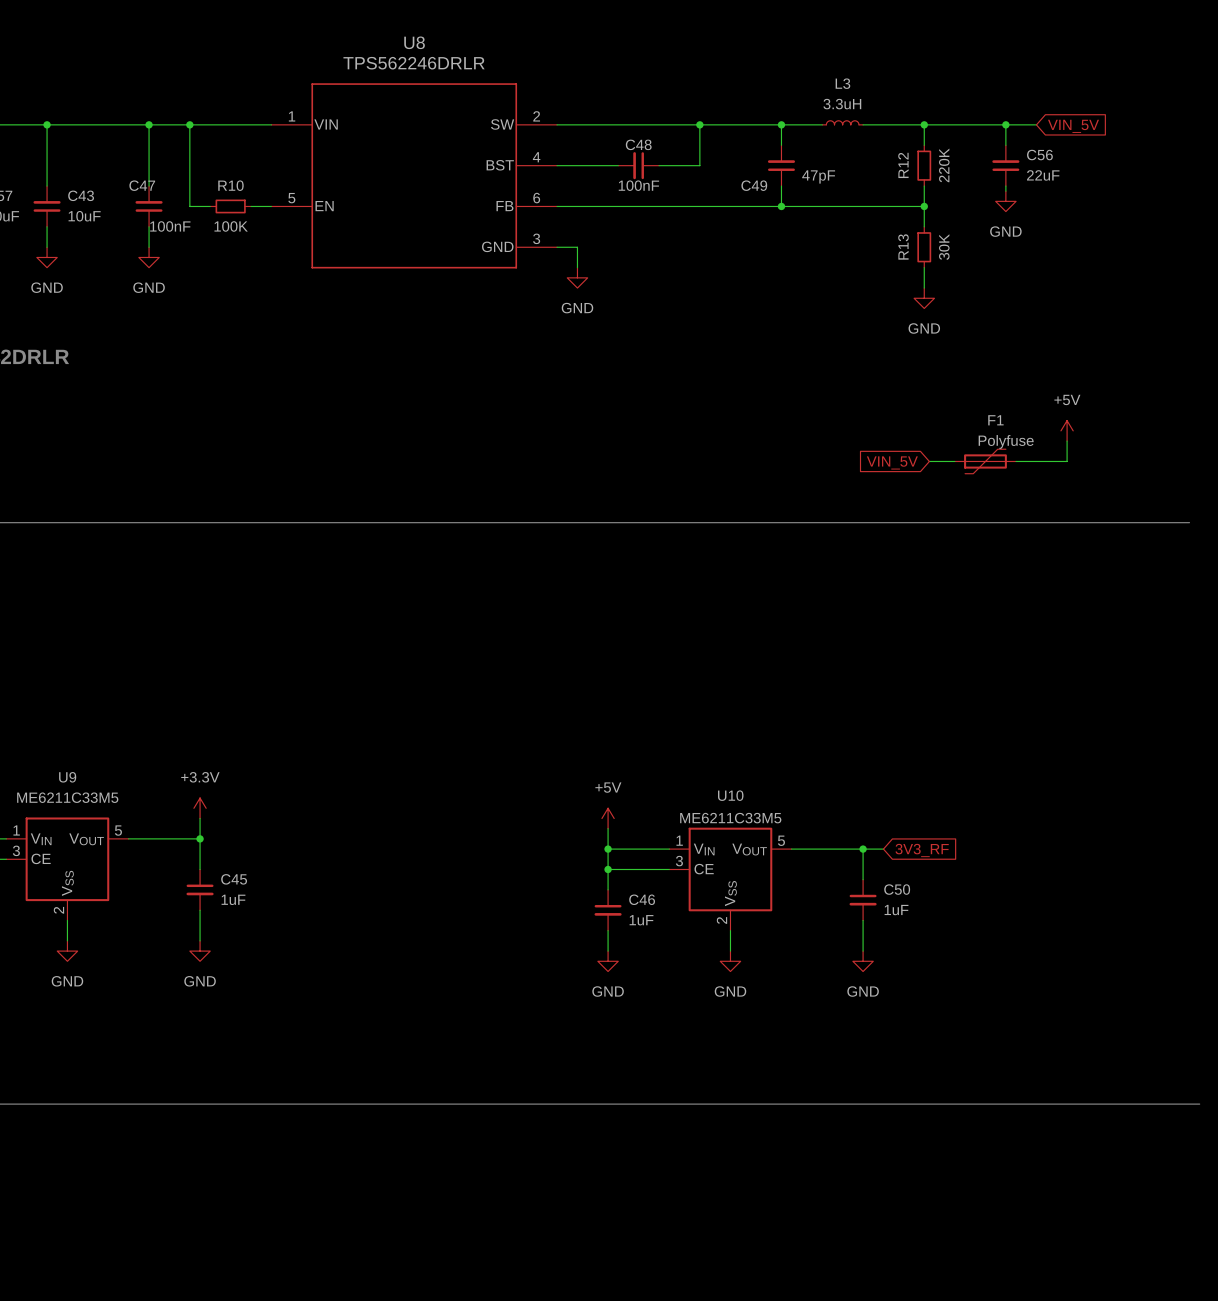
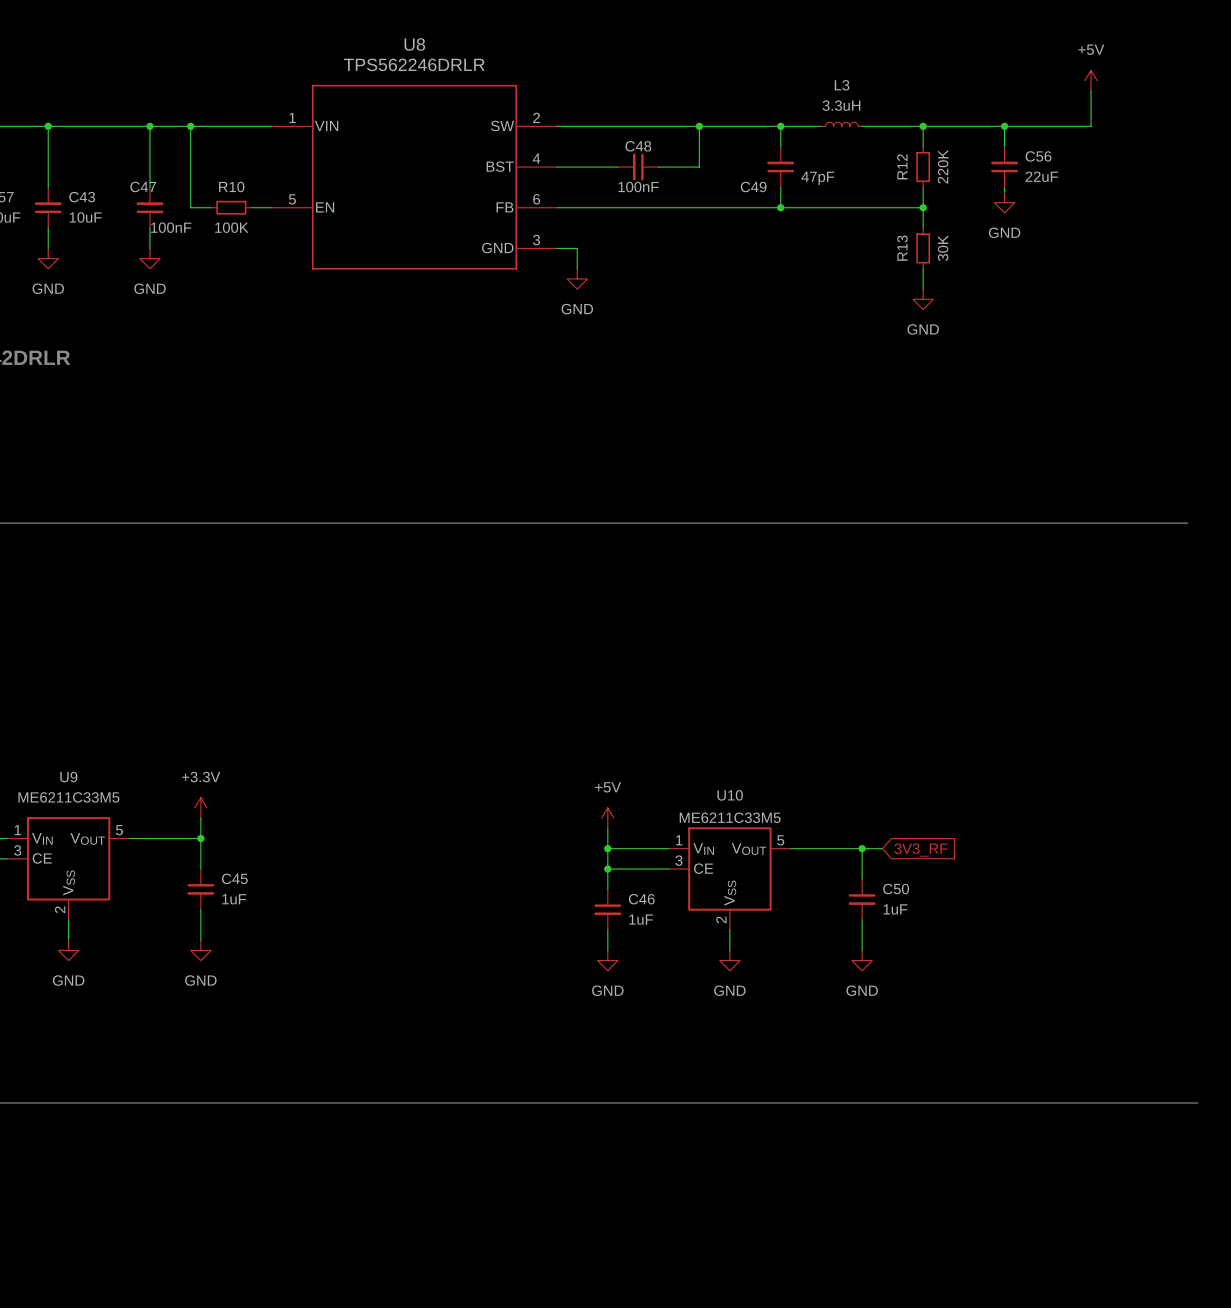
power symbol: none -> +5V (1091, 80)
wire: none -> (1091, 90) (1091, 126) (1035, 126)
global label: VIN_5V (1073, 126) -> none
power symbol: +5V (1067, 430) -> none
wire: (1067, 441) (1067, 461) (1016, 461) -> none
wire: (929, 461) (954, 461) -> none
F1: Polyfuse (985, 461) -> none
global label: VIN_5V (892, 462) -> none

